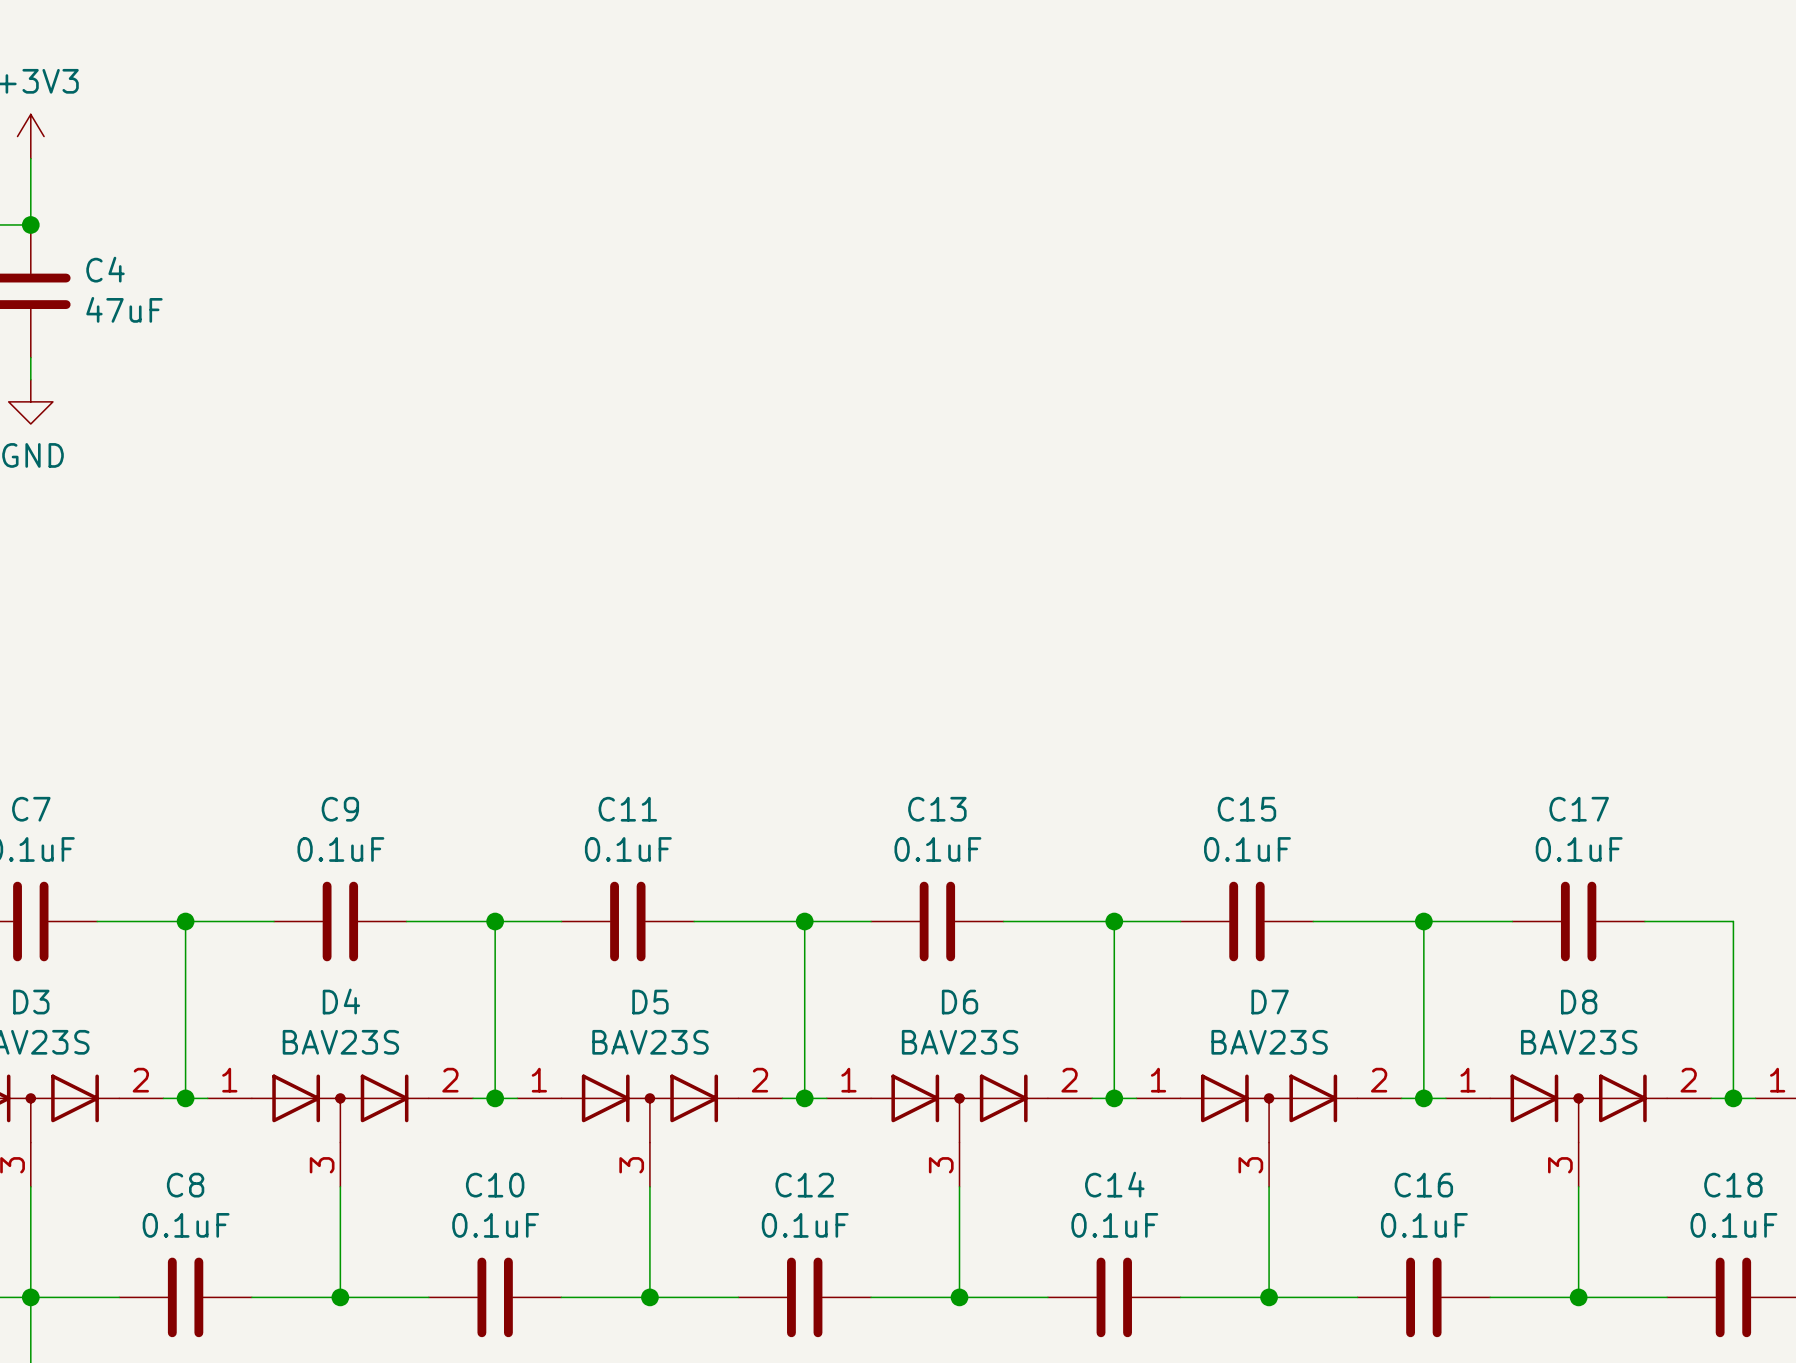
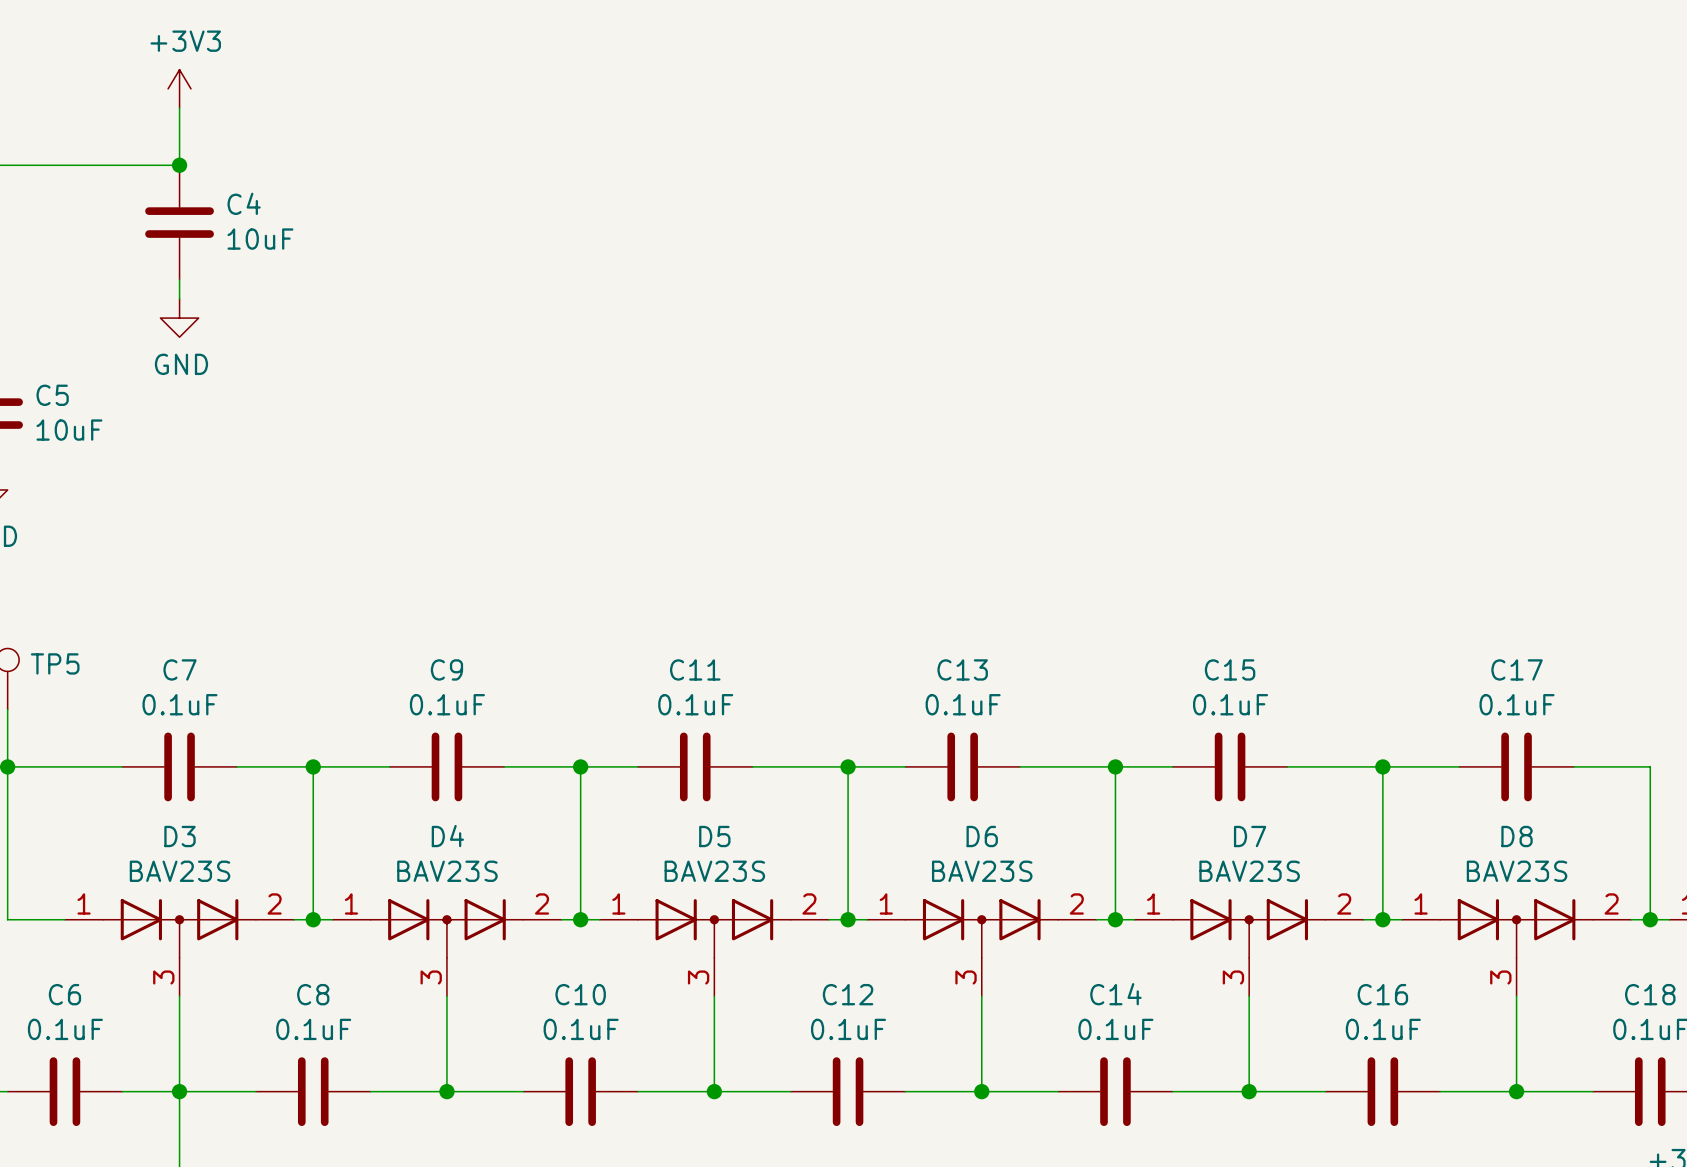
C4 value: 47uF (124, 309) -> 10uF (260, 239)

